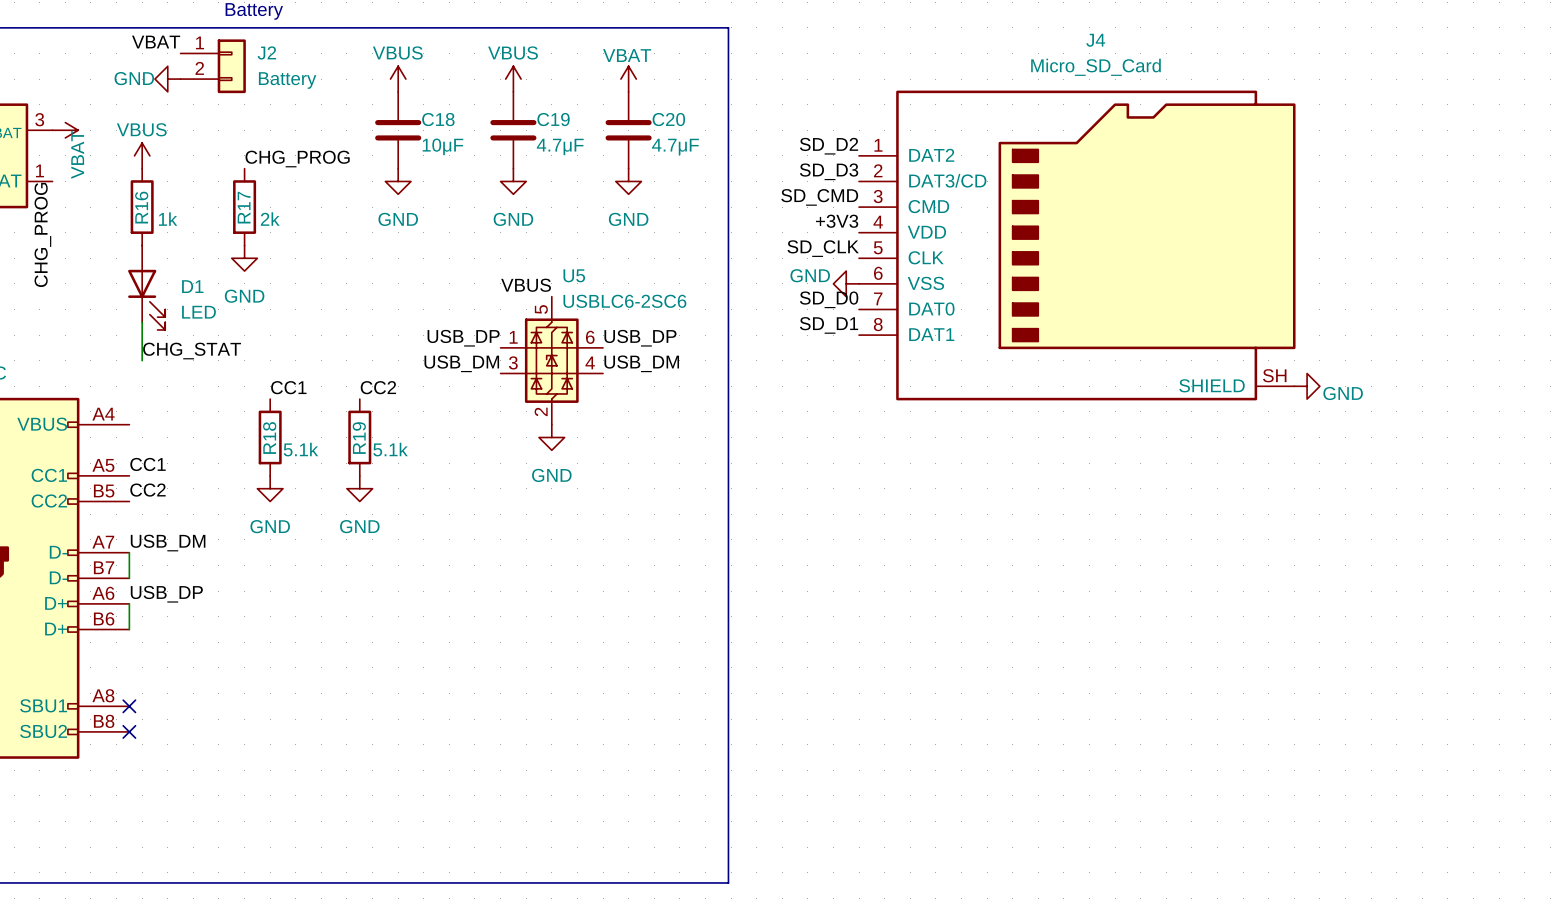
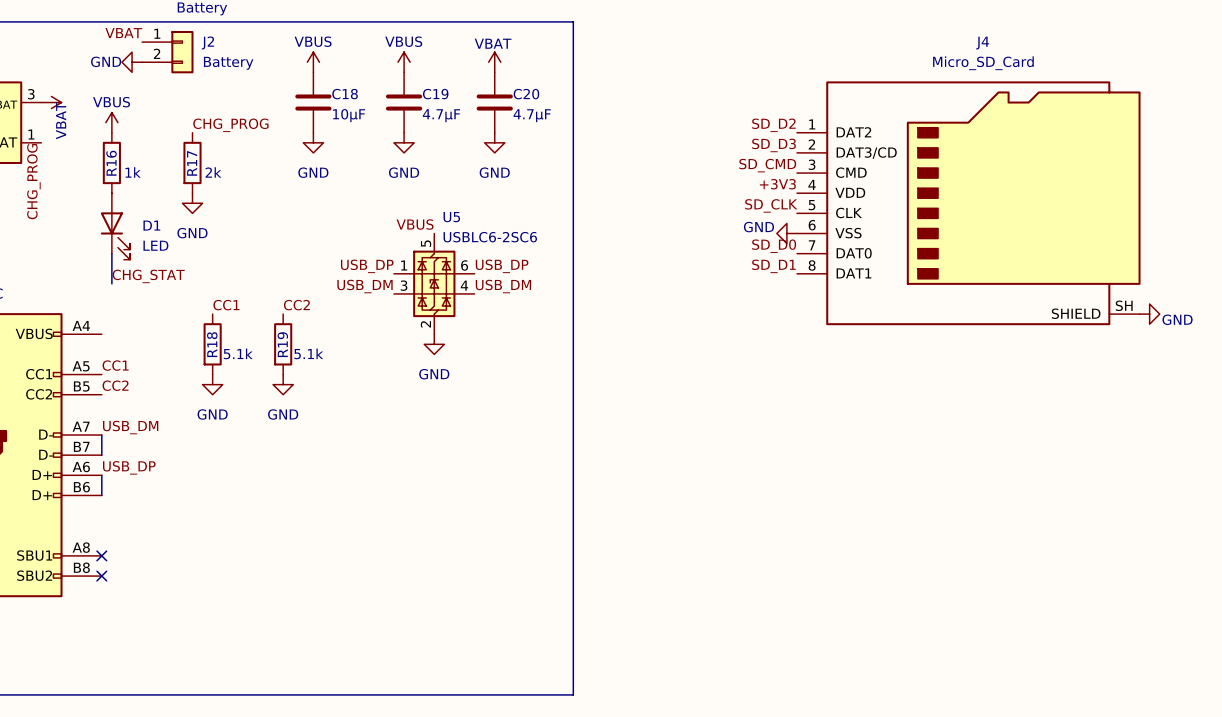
label position: SD_D2 (828, 146) -> SD_D2 (773, 125)
label position: SD_D3 (829, 171) -> SD_D3 (774, 145)
label position: SD_CMD (819, 197) -> SD_CMD (767, 165)
label position: +3V3 (837, 221) -> +3V3 (777, 184)
J4 position: (1077, 245) -> (968, 203)
label position: SD_CLK (823, 248) -> SD_CLK (771, 205)
power symbol position: GND (846, 283) -> GND (786, 233)
label position: SD_D0 (829, 299) -> SD_D0 (774, 246)
label position: SD_D1 (829, 325) -> SD_D1 (773, 266)
power symbol position: GND (1307, 386) -> GND (1149, 314)

